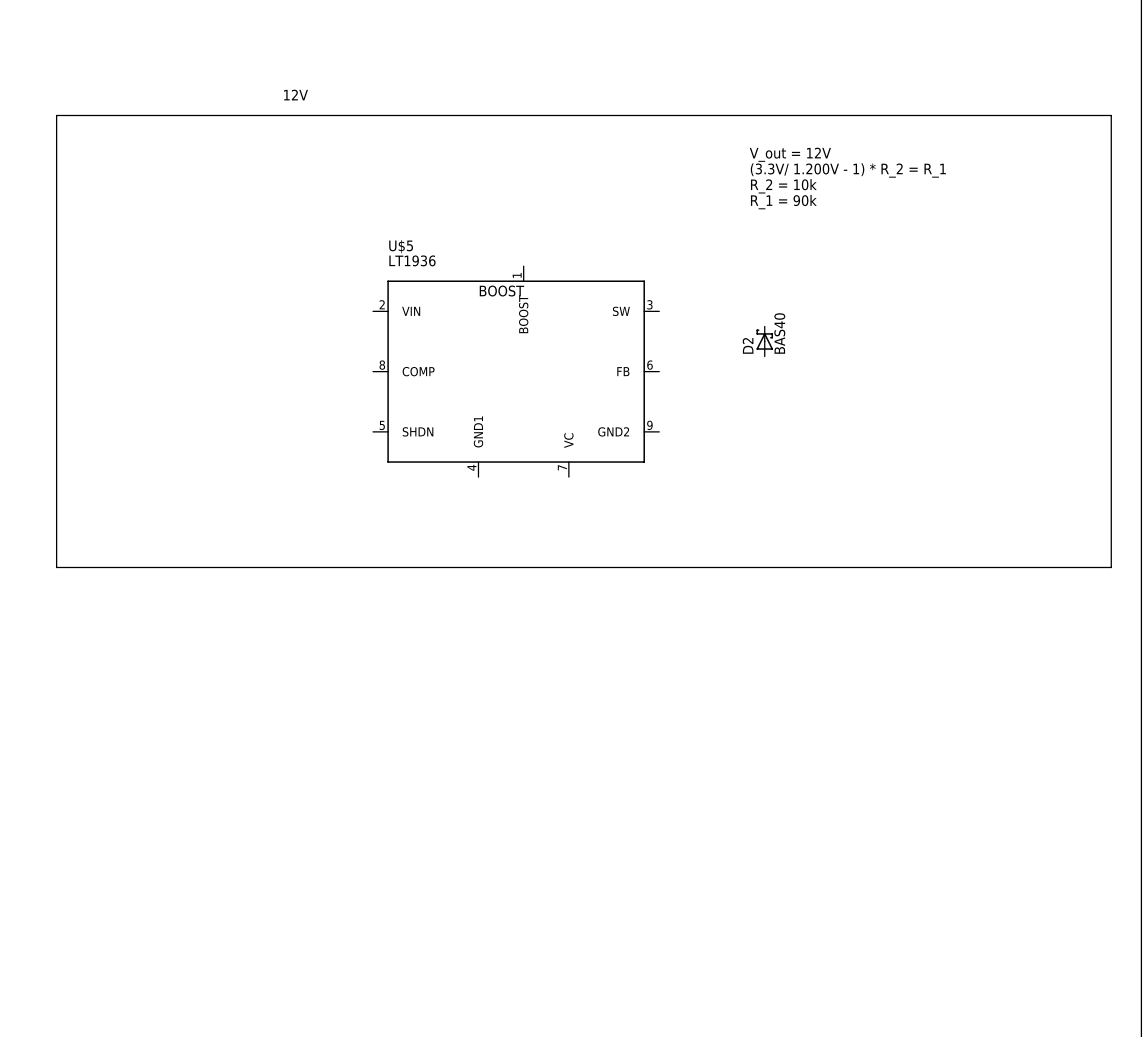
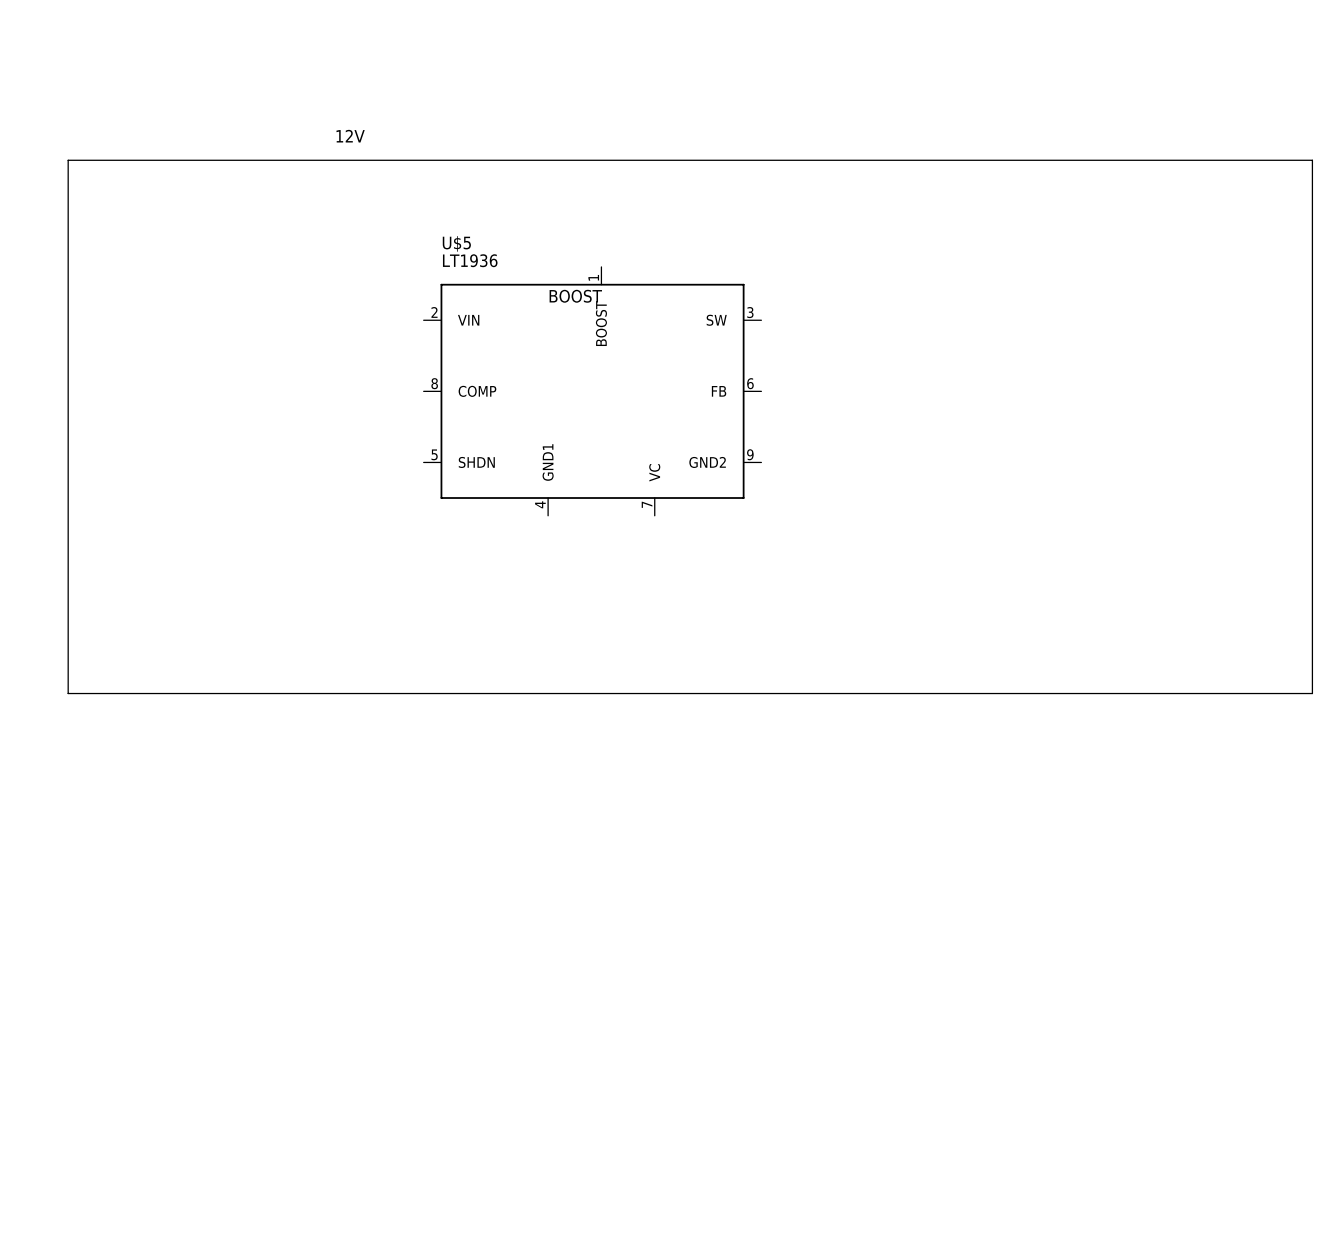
text: V_out = 12V (790, 154) -> none
text: (3.3V/ 1.200V - 1) * R_2 = R_1 (848, 170) -> none
text: R_2 = 10k (783, 186) -> none
text: R_1 = 90k (783, 202) -> none
D2: BAS40 (764, 341) -> none
U$5 position: (516, 371) -> (592, 391)

